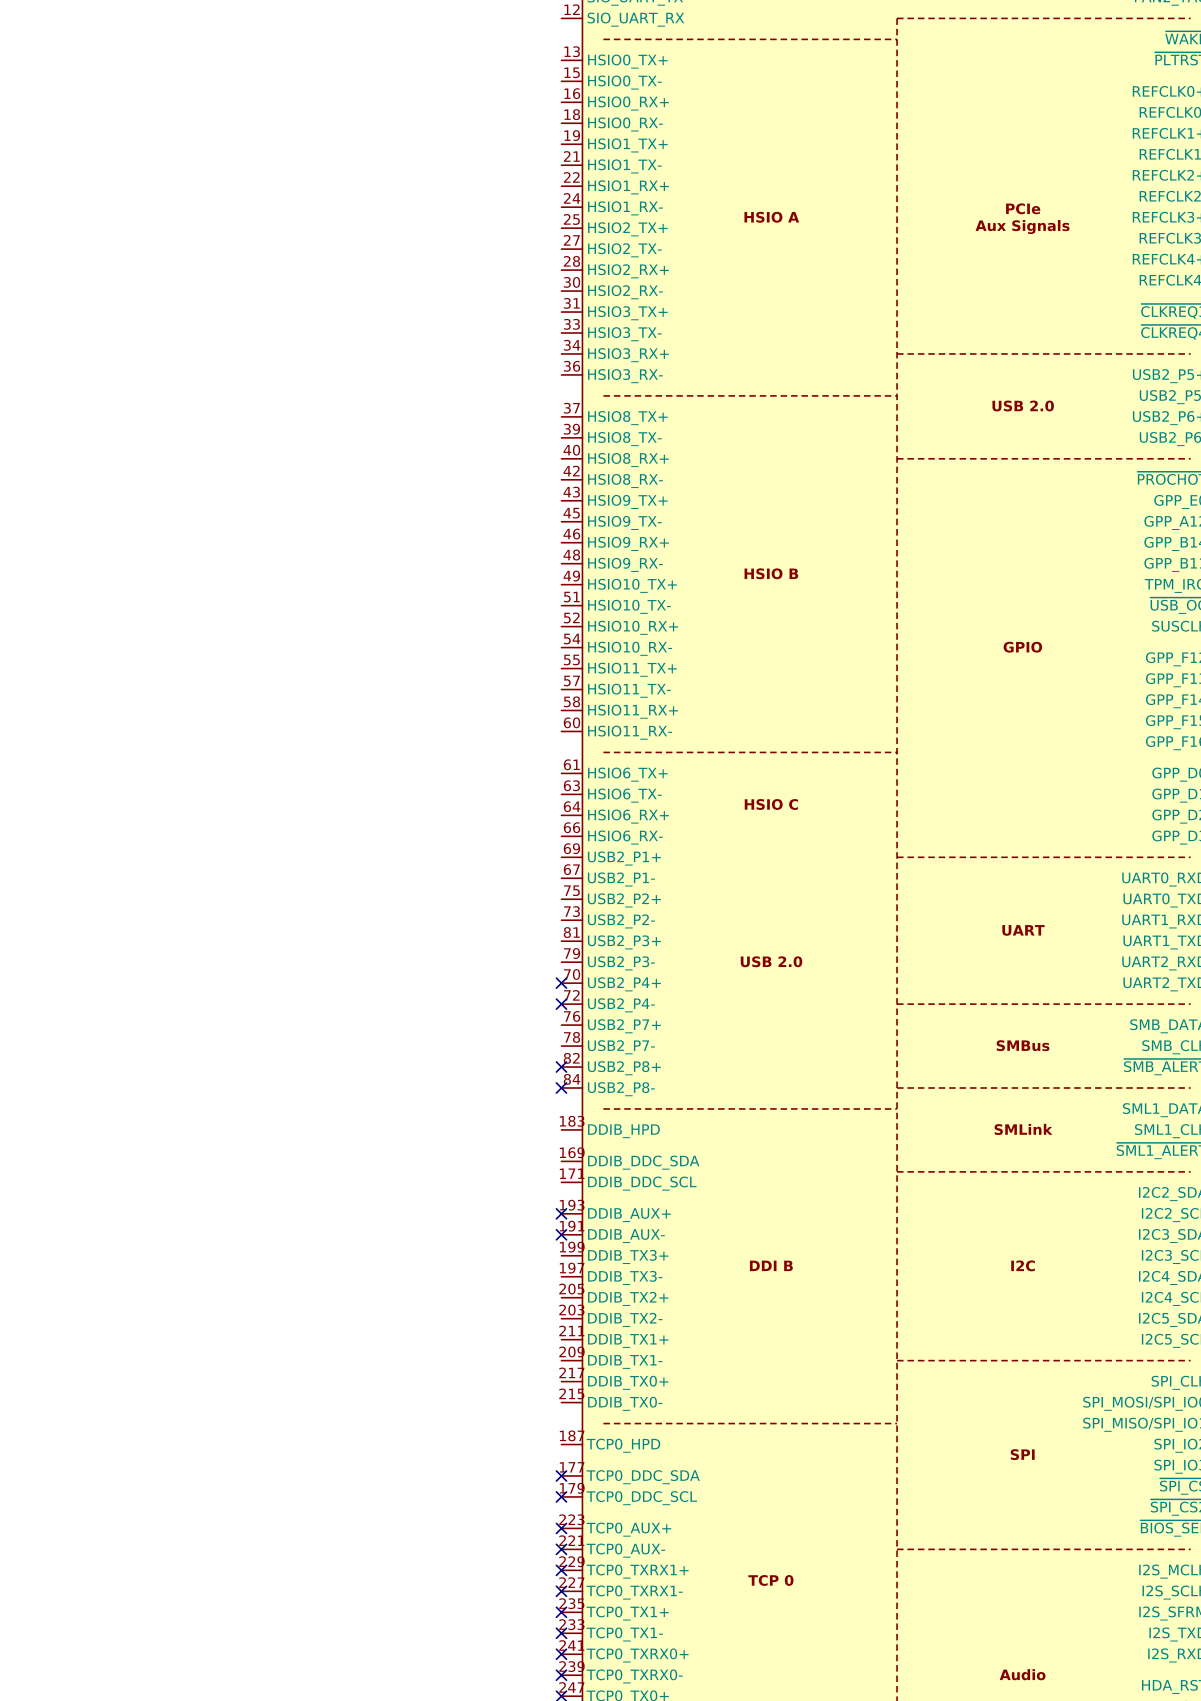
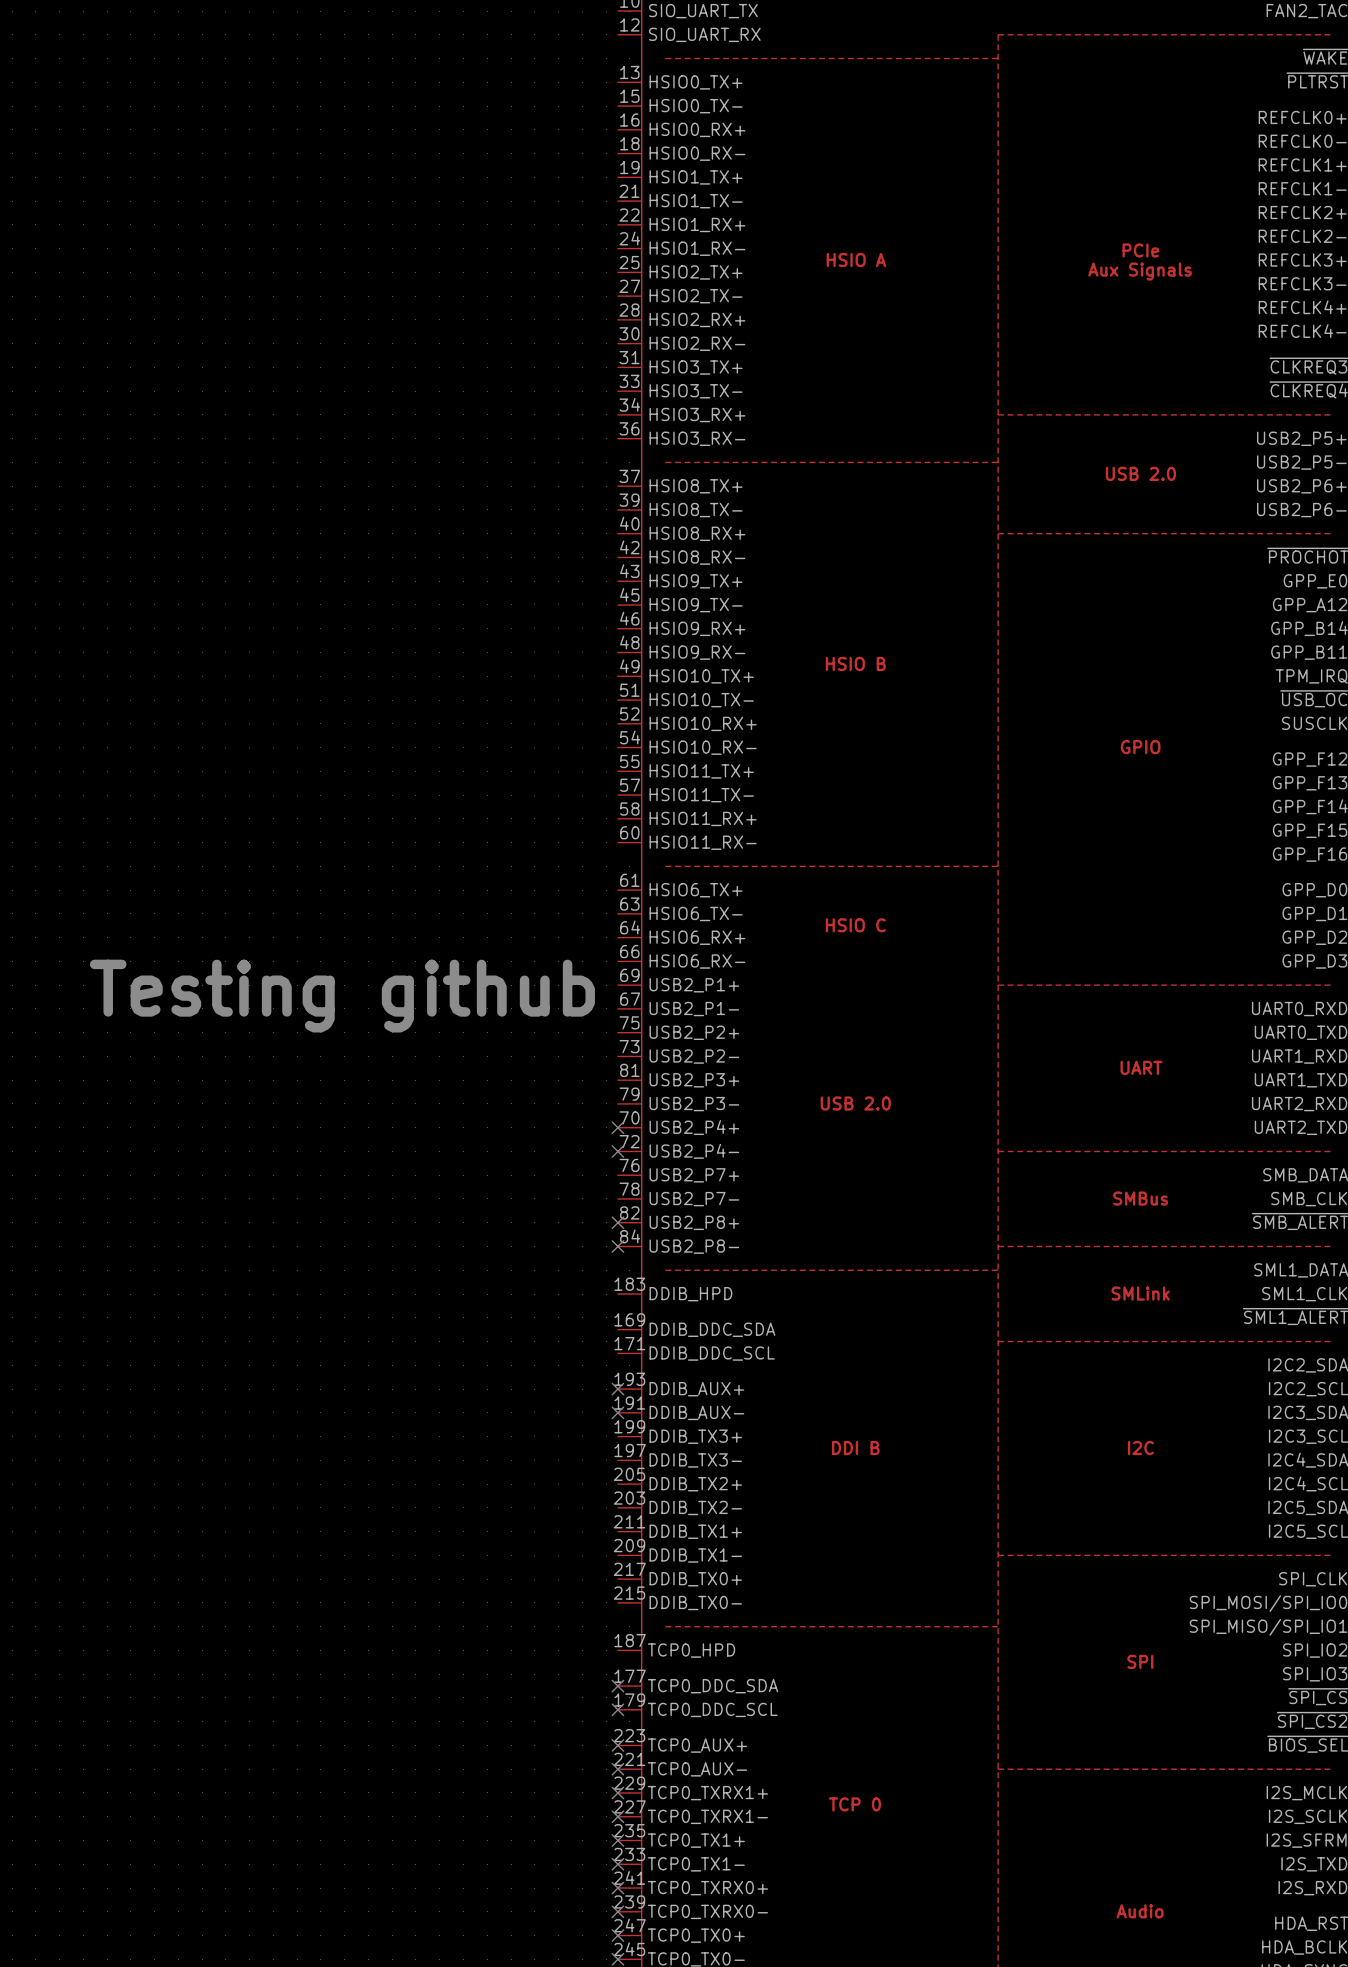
text: none -> Testing github (342, 996)

